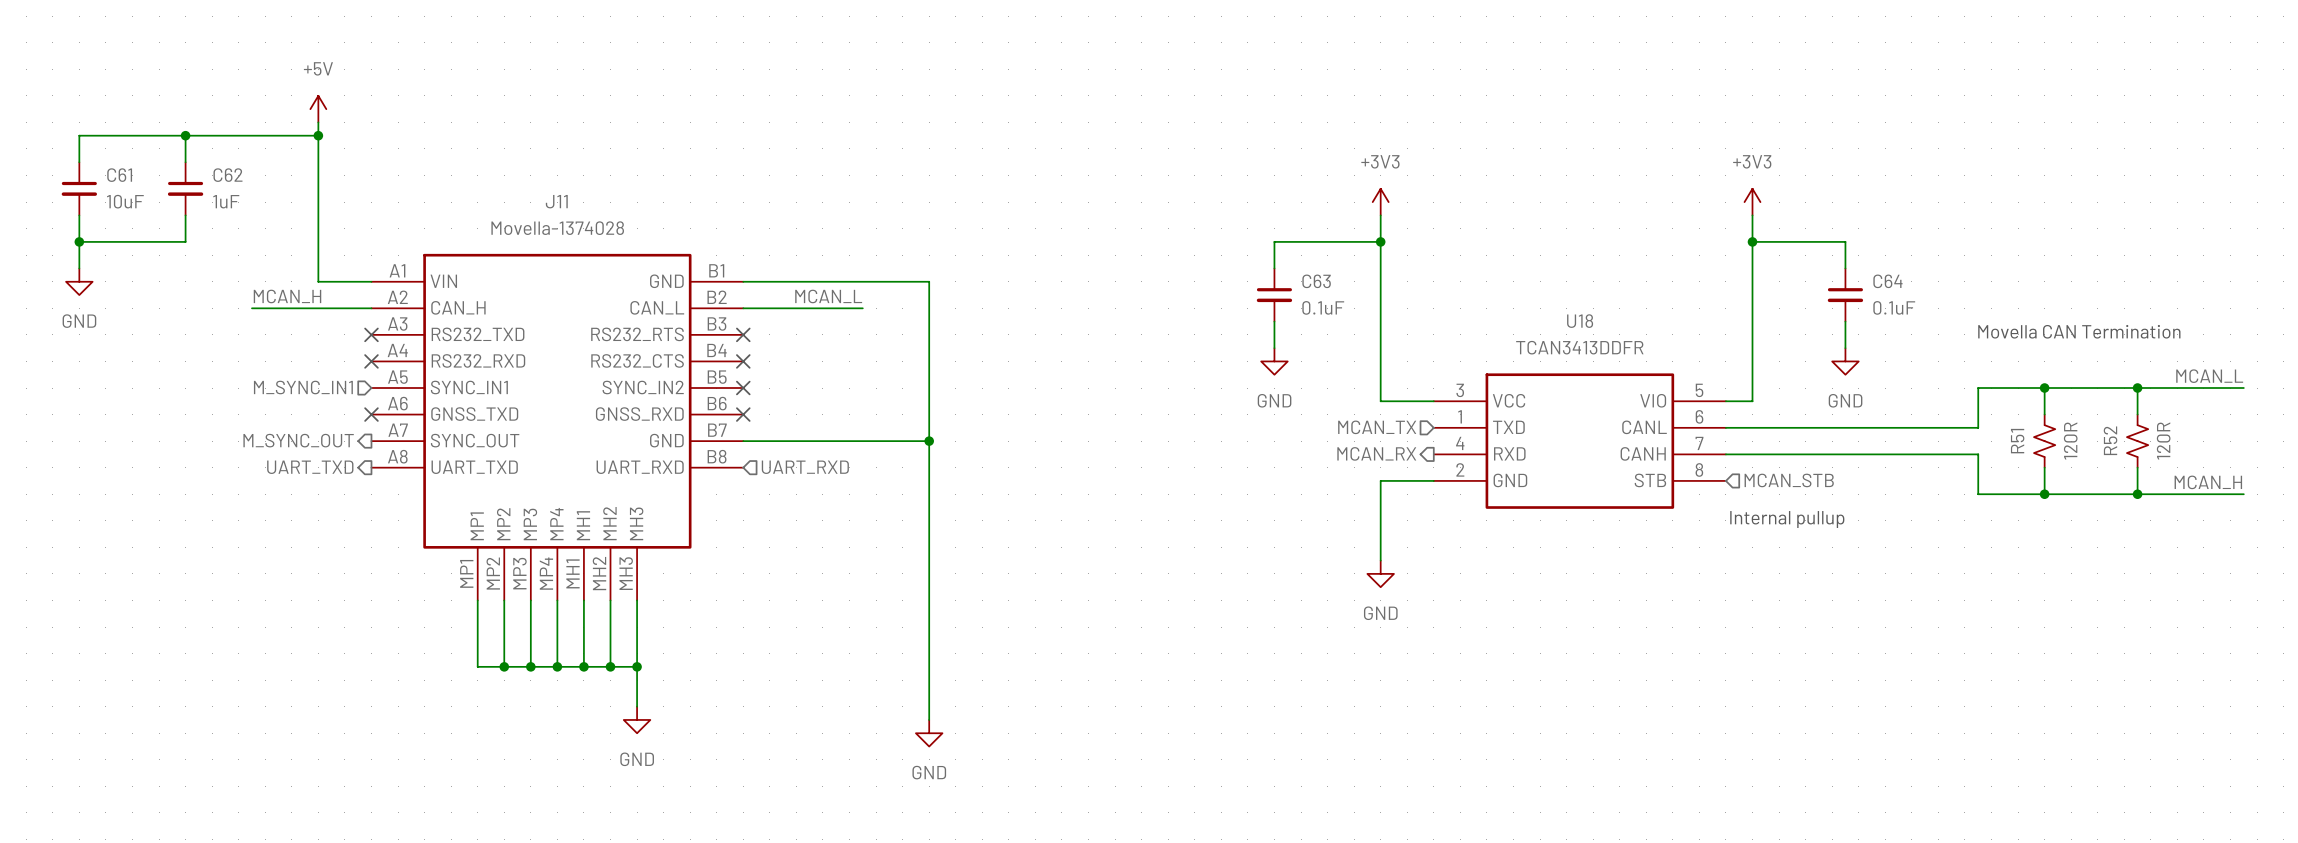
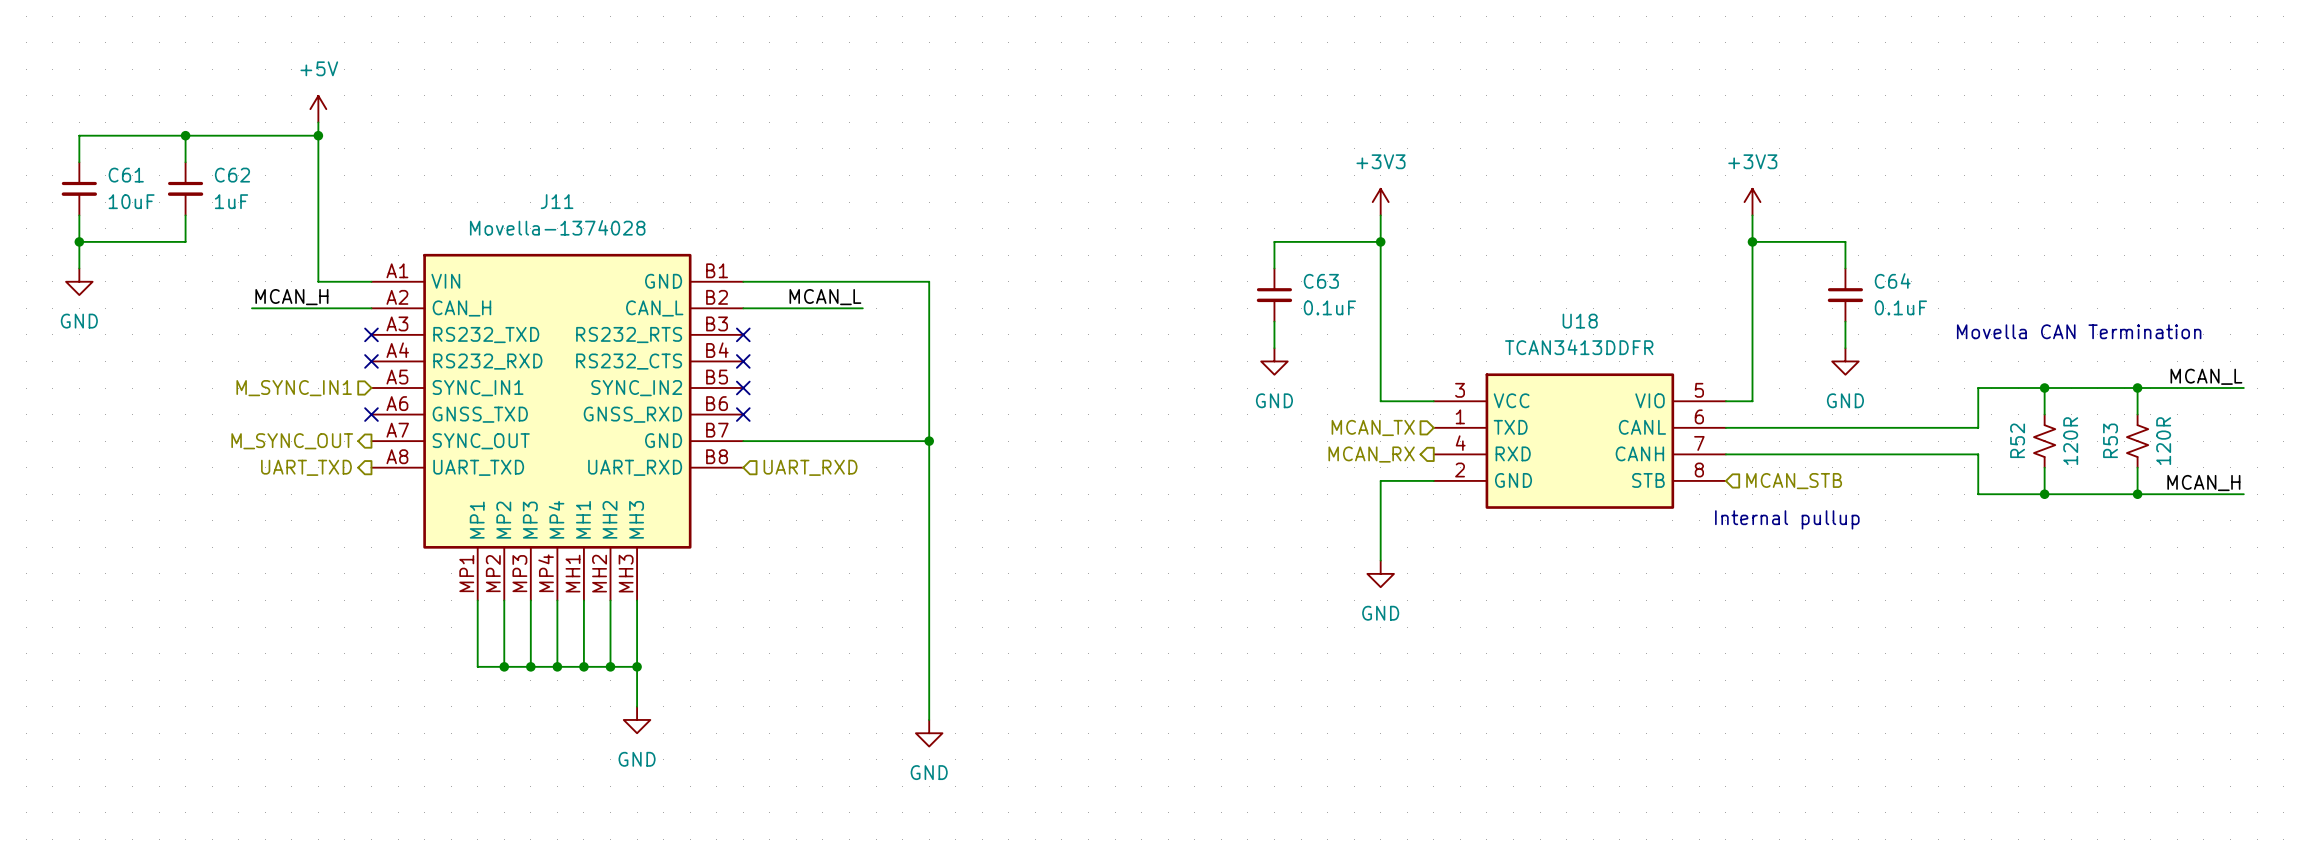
R52 name: R52 (2110, 440) -> R53 (2110, 440)
R51 name: R51 (2017, 441) -> R52 (2017, 440)

